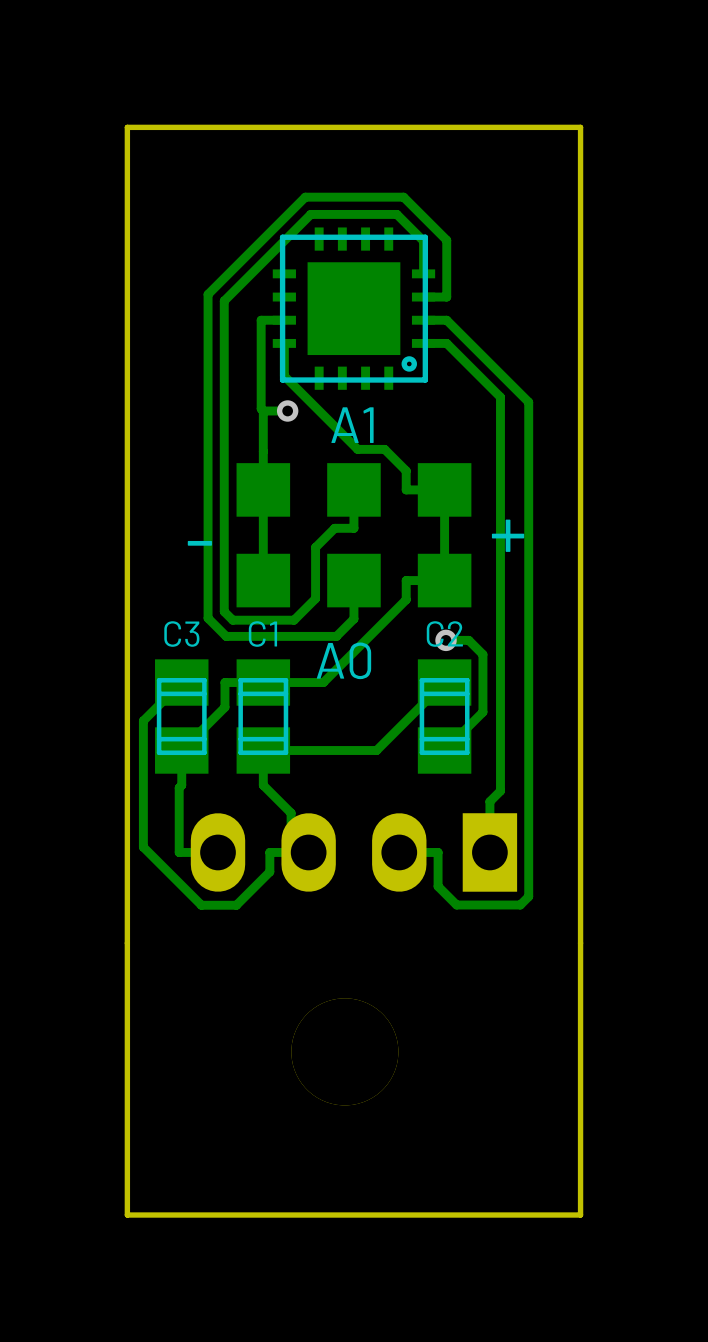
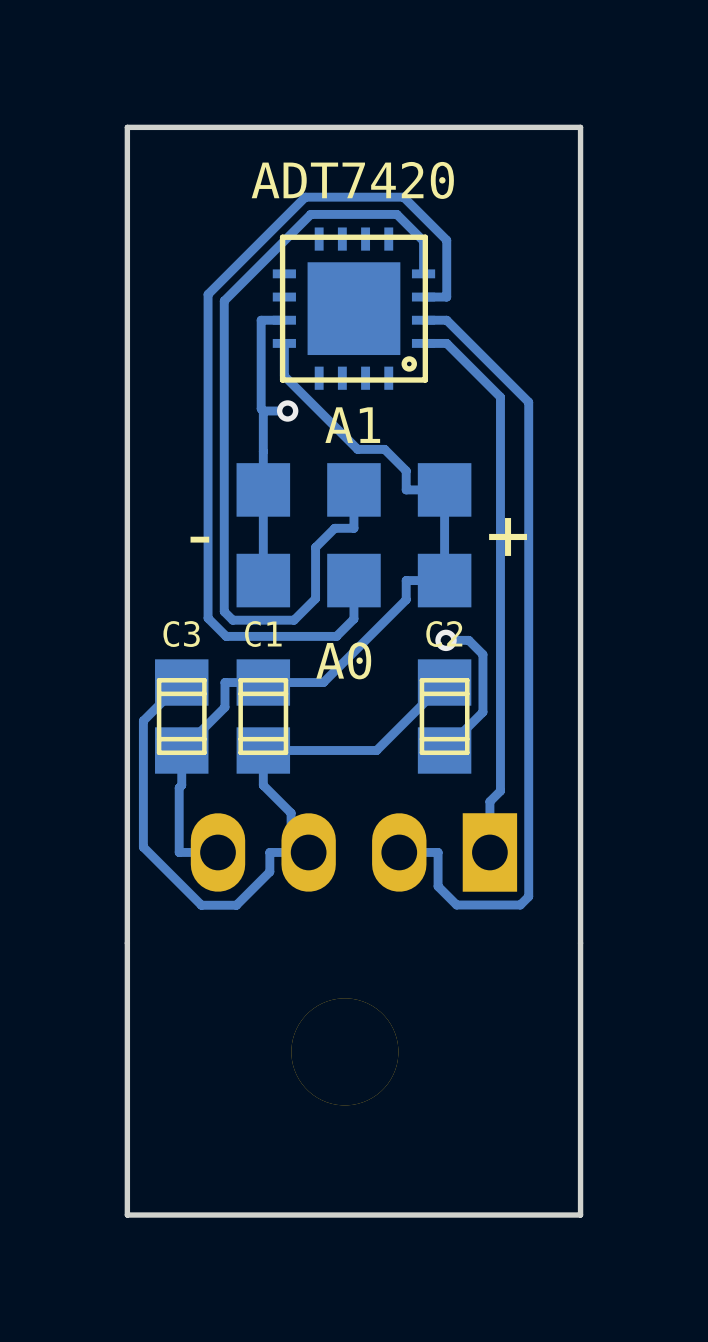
part value: none -> ADT7420 (352, 180)

